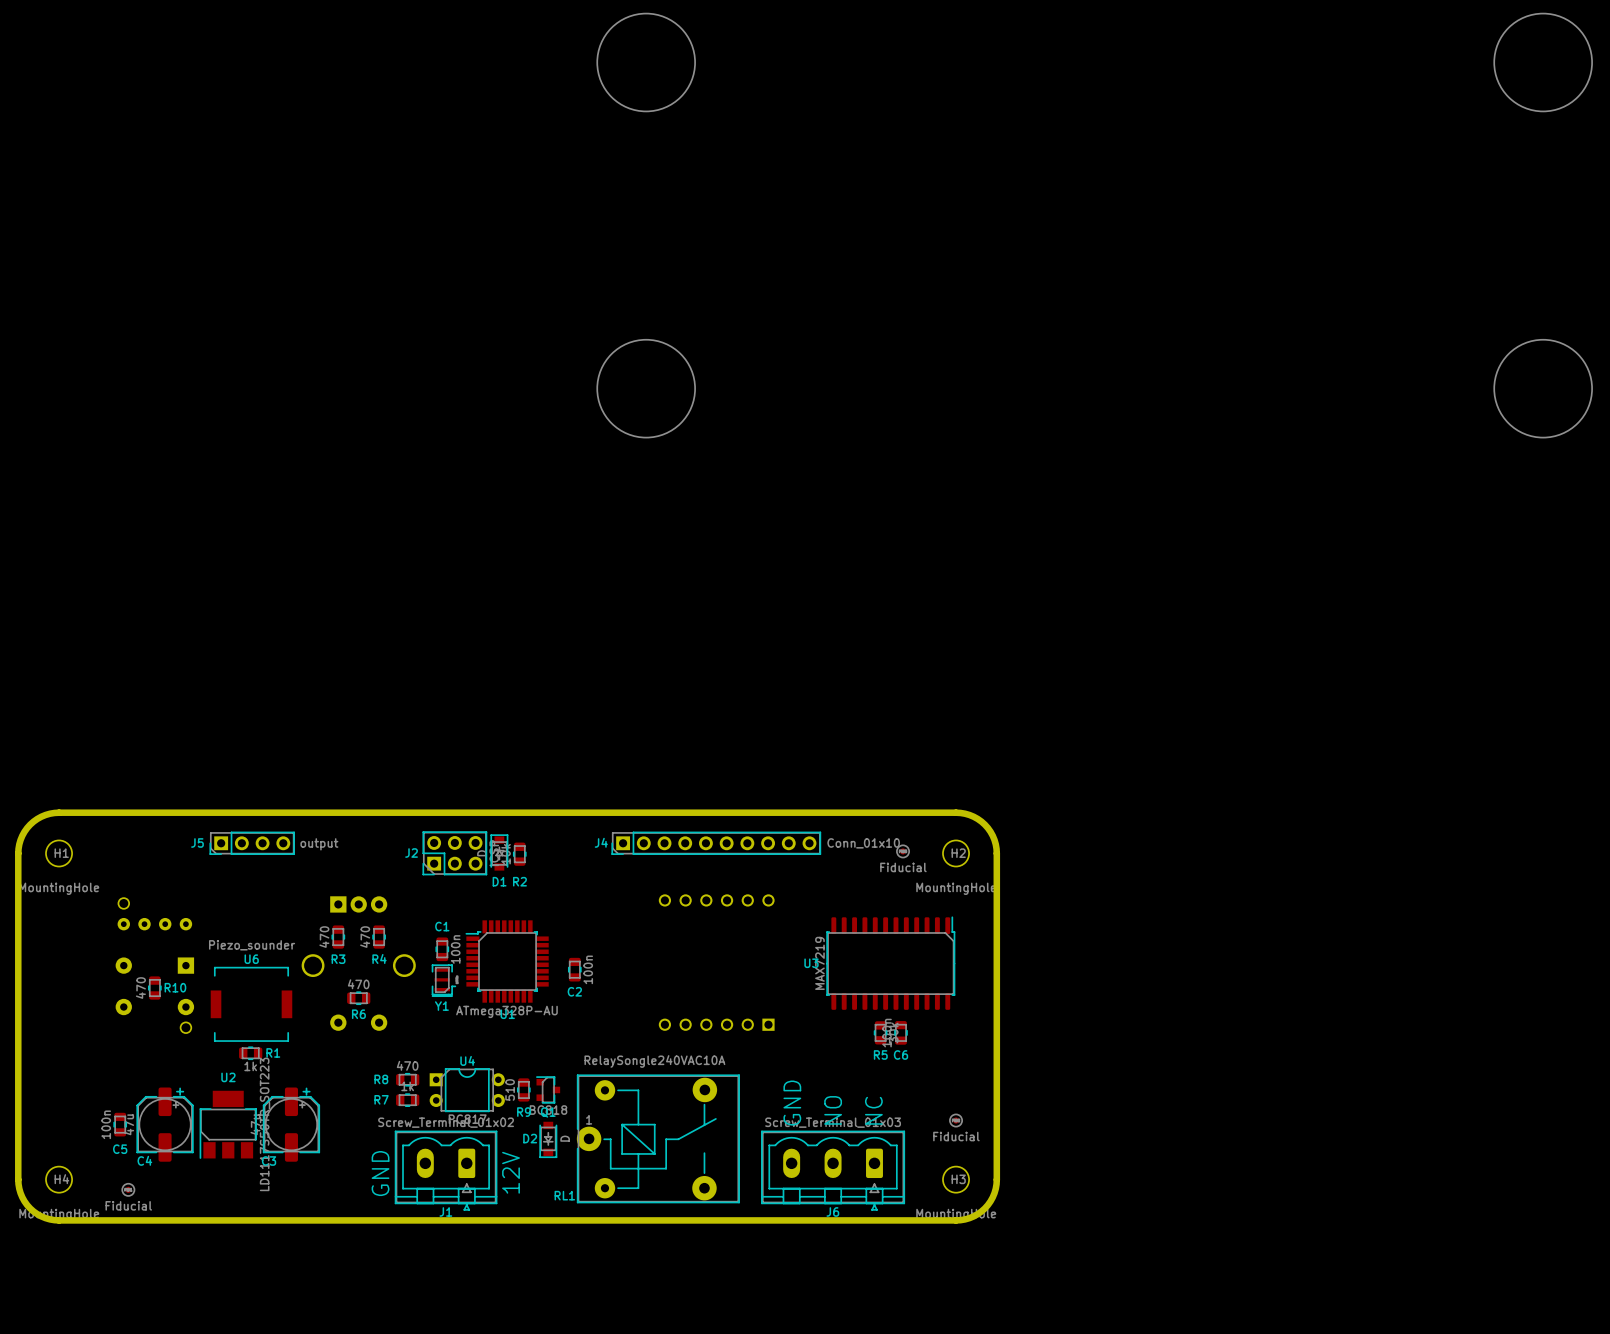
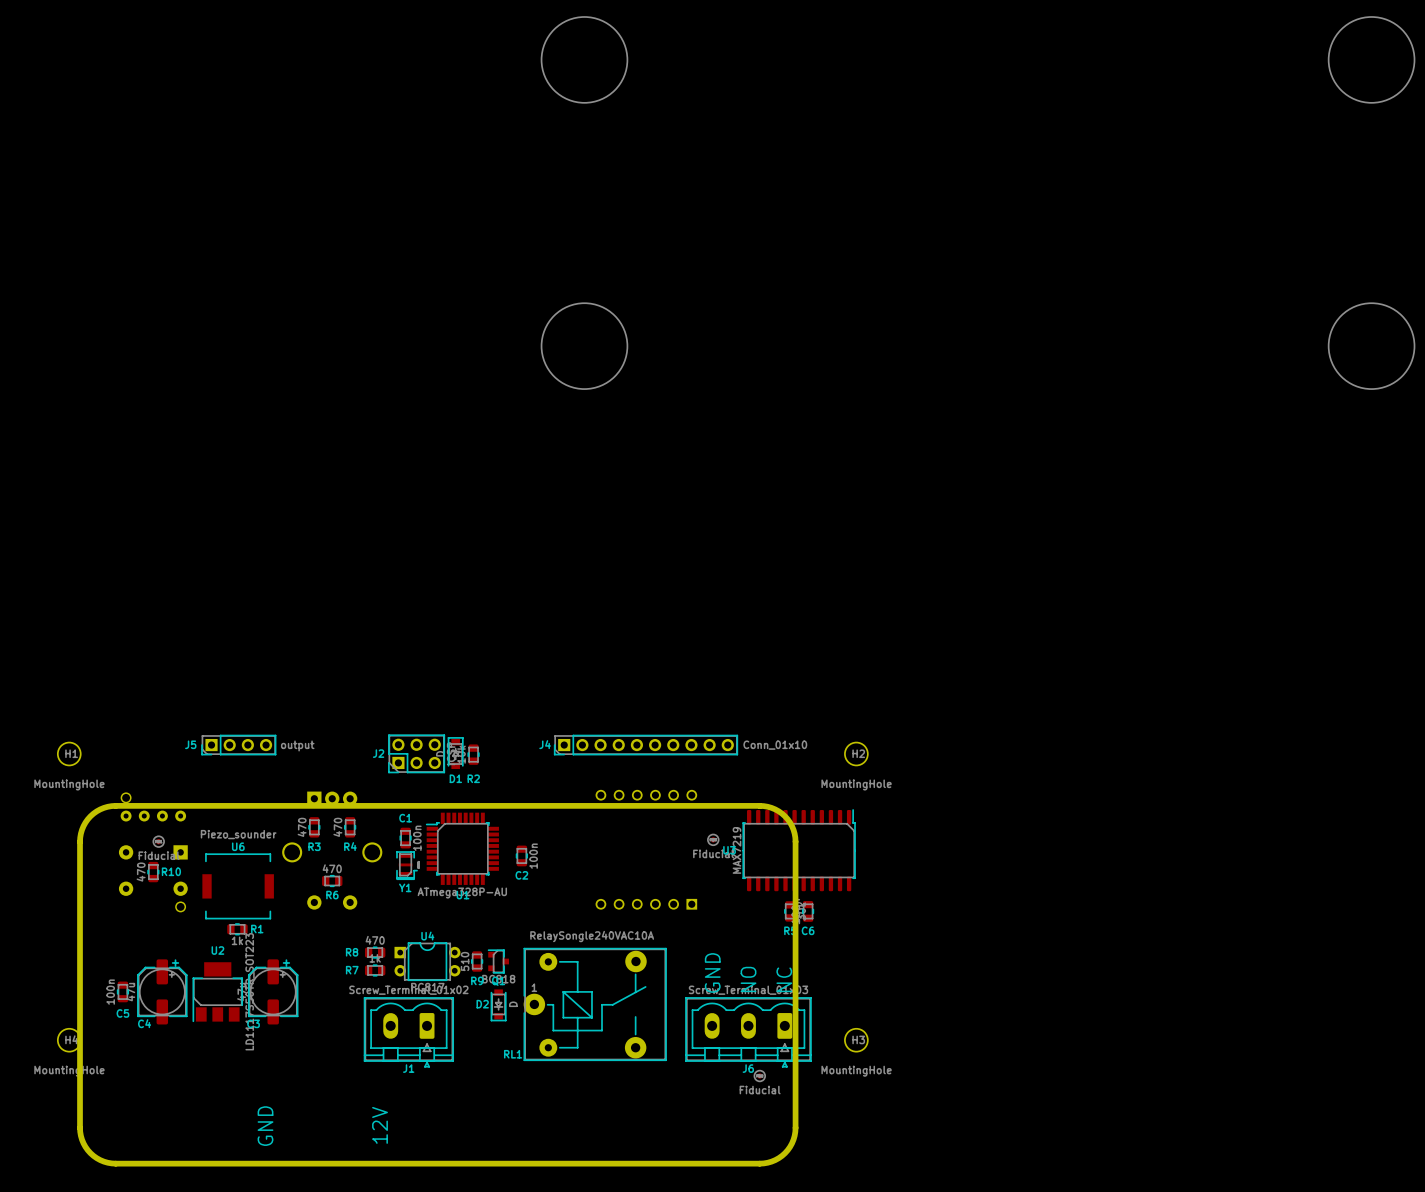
board edge: (59, 812) (956, 812) (969, 814) (977, 818) (987, 828) (994, 840) (996, 848) (996, 1179) (994, 1193) (987, 1205) (977, 1214) (965, 1219) (956, 1220) (59, 1220) (45, 1218) (37, 1214) (27, 1205) (20, 1193) (18, 1184) (18, 853) (20, 840) (30, 824) (45, 814) (59, 812) -> (115, 805) (103, 807) (90, 816) (82, 829) (80, 841) (80, 1131) (85, 1146) (100, 1160) (115, 1163) (759, 1163) (778, 1158) (792, 1143) (795, 1127) (795, 841) (790, 822) (775, 809) (759, 805) (115, 805)
part position: (903, 851) -> (713, 839)
part position: (956, 1120) -> (759, 1076)
text position: 12V (511, 1172) -> 12V (380, 1125)
text position: GND (380, 1173) -> GND (265, 1126)
part position: (128, 1189) -> (158, 841)

